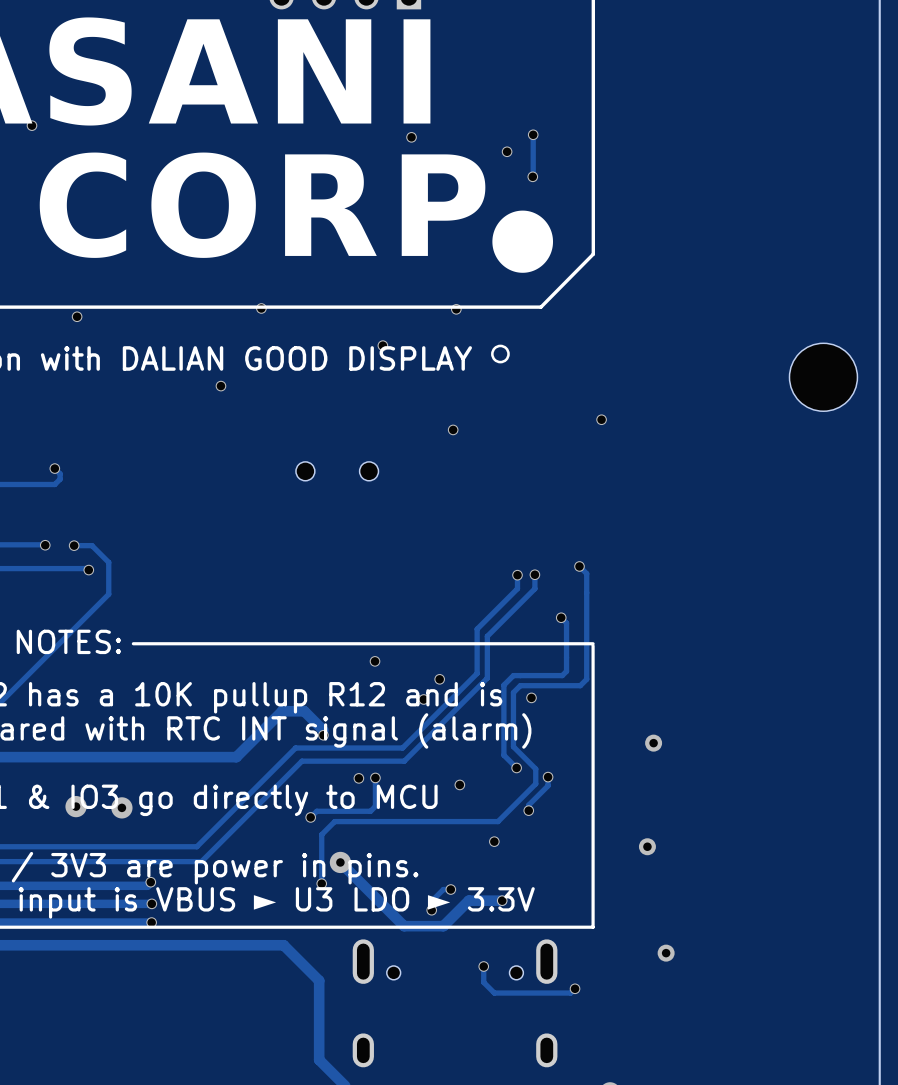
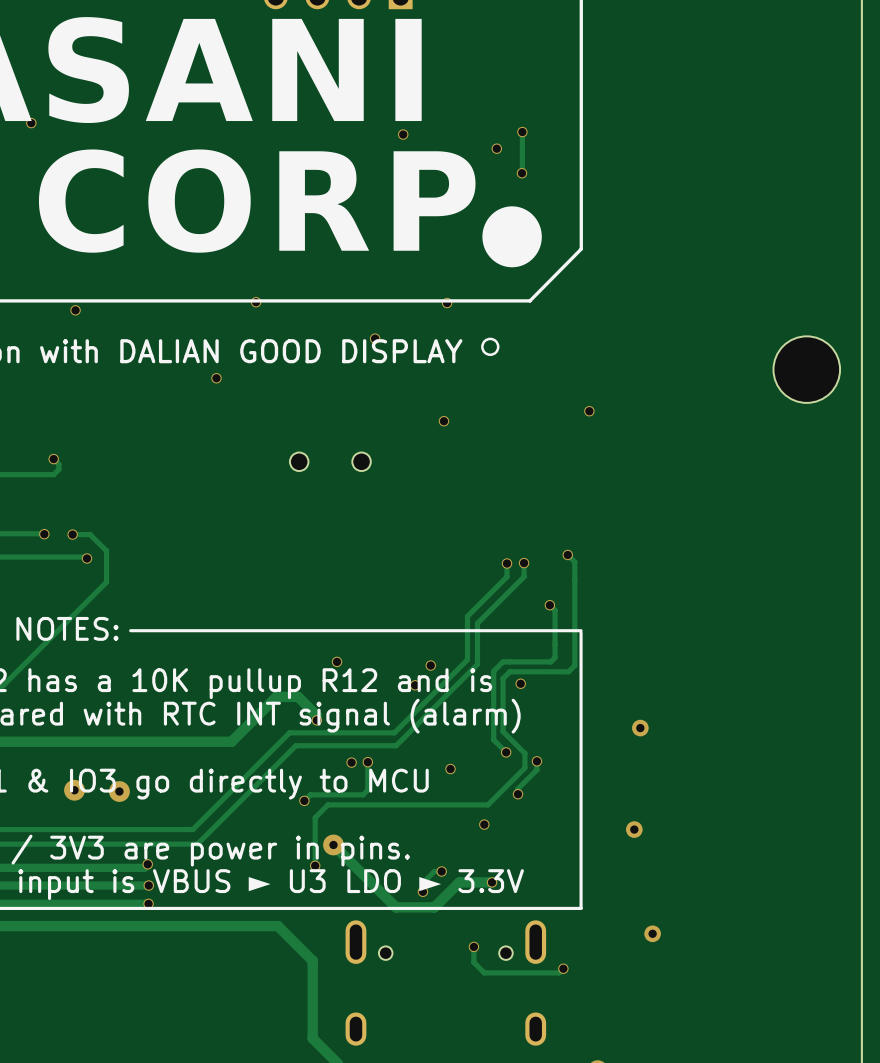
via position: (375, 661) -> (337, 661)

